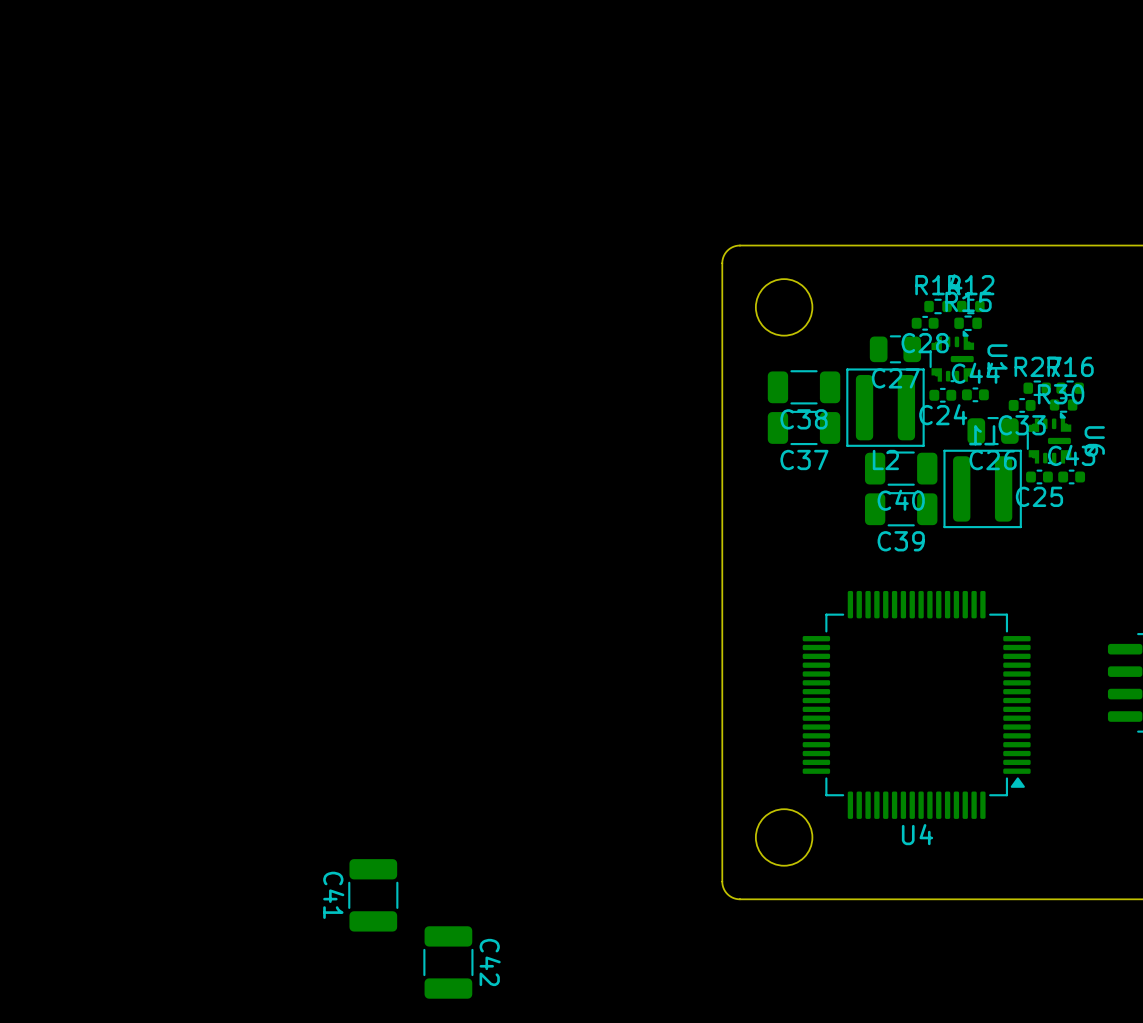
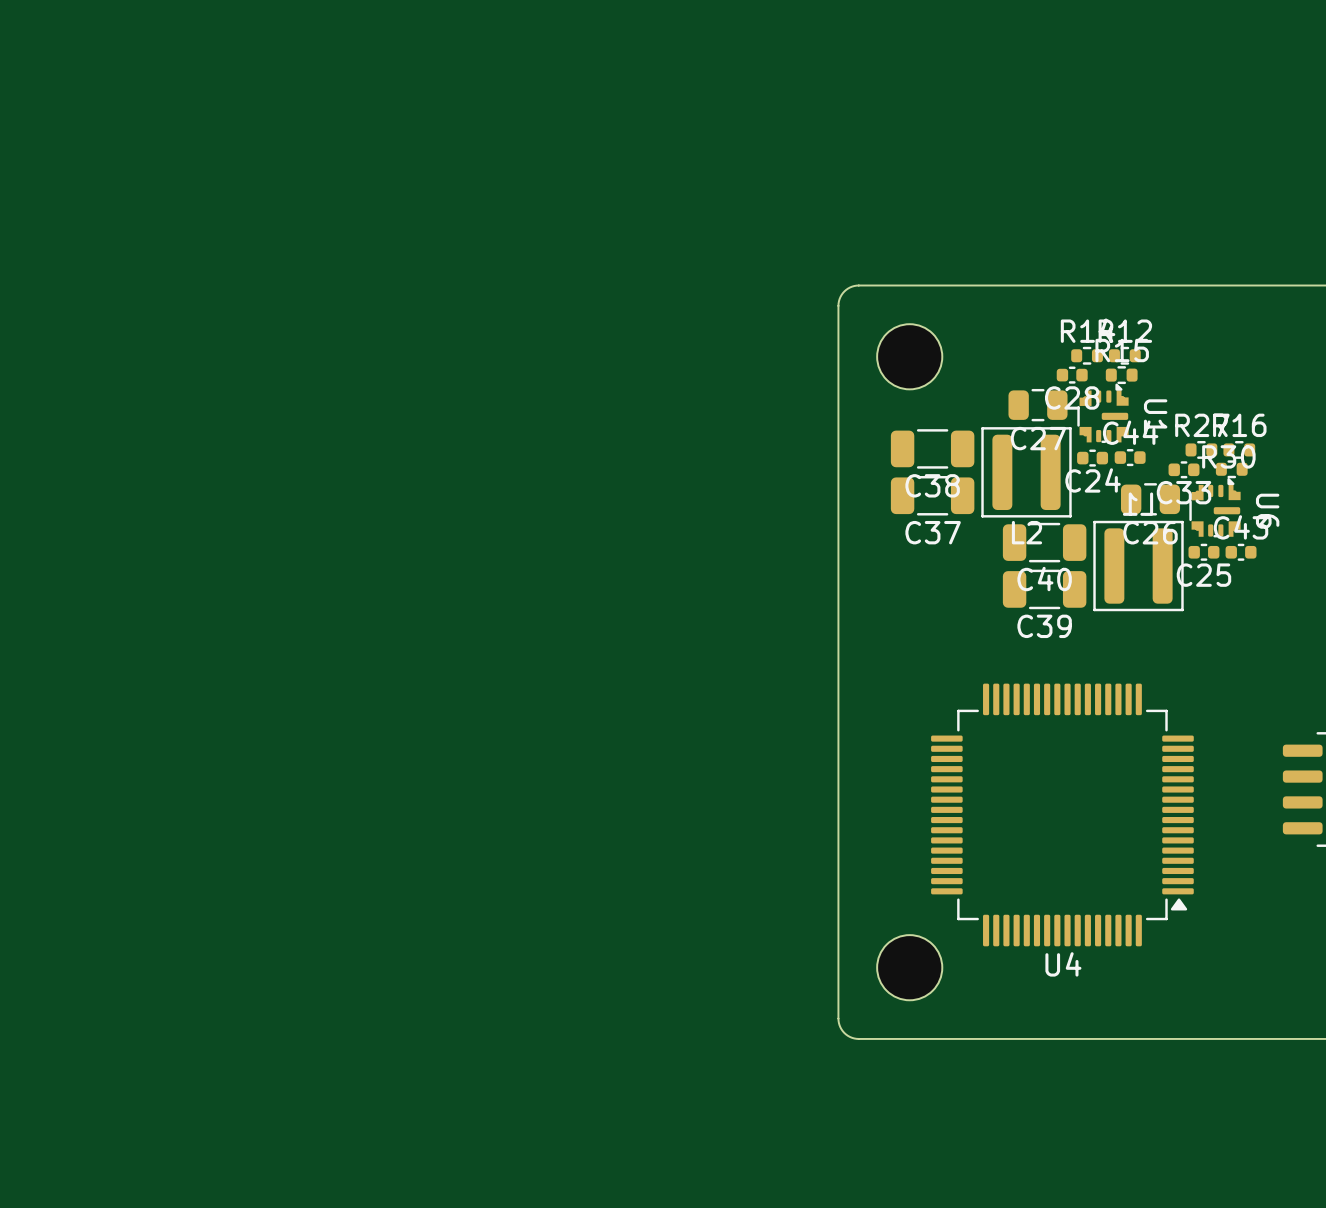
C41: (373, 895) -> none
C42: (448, 962) -> none

